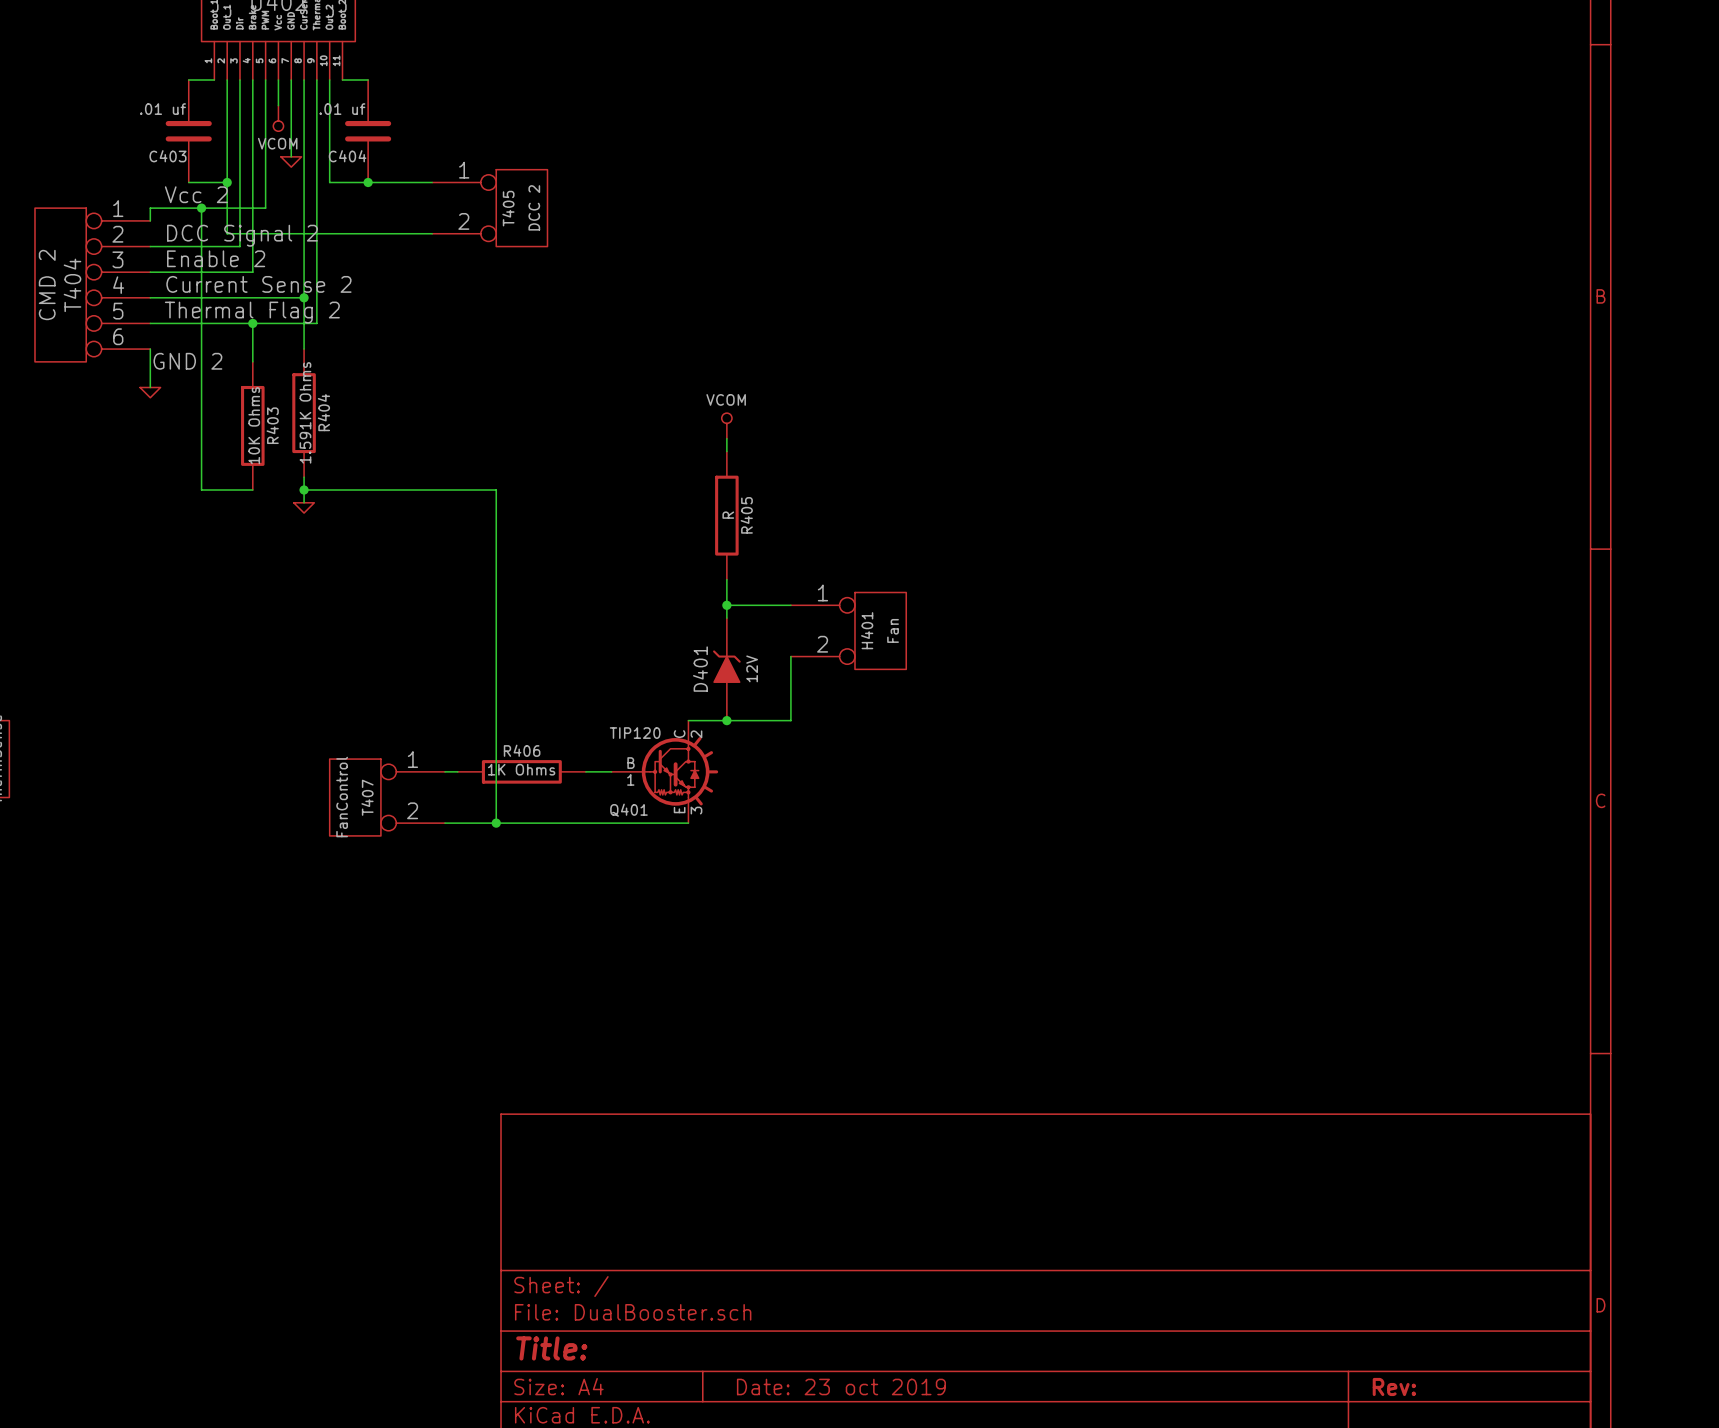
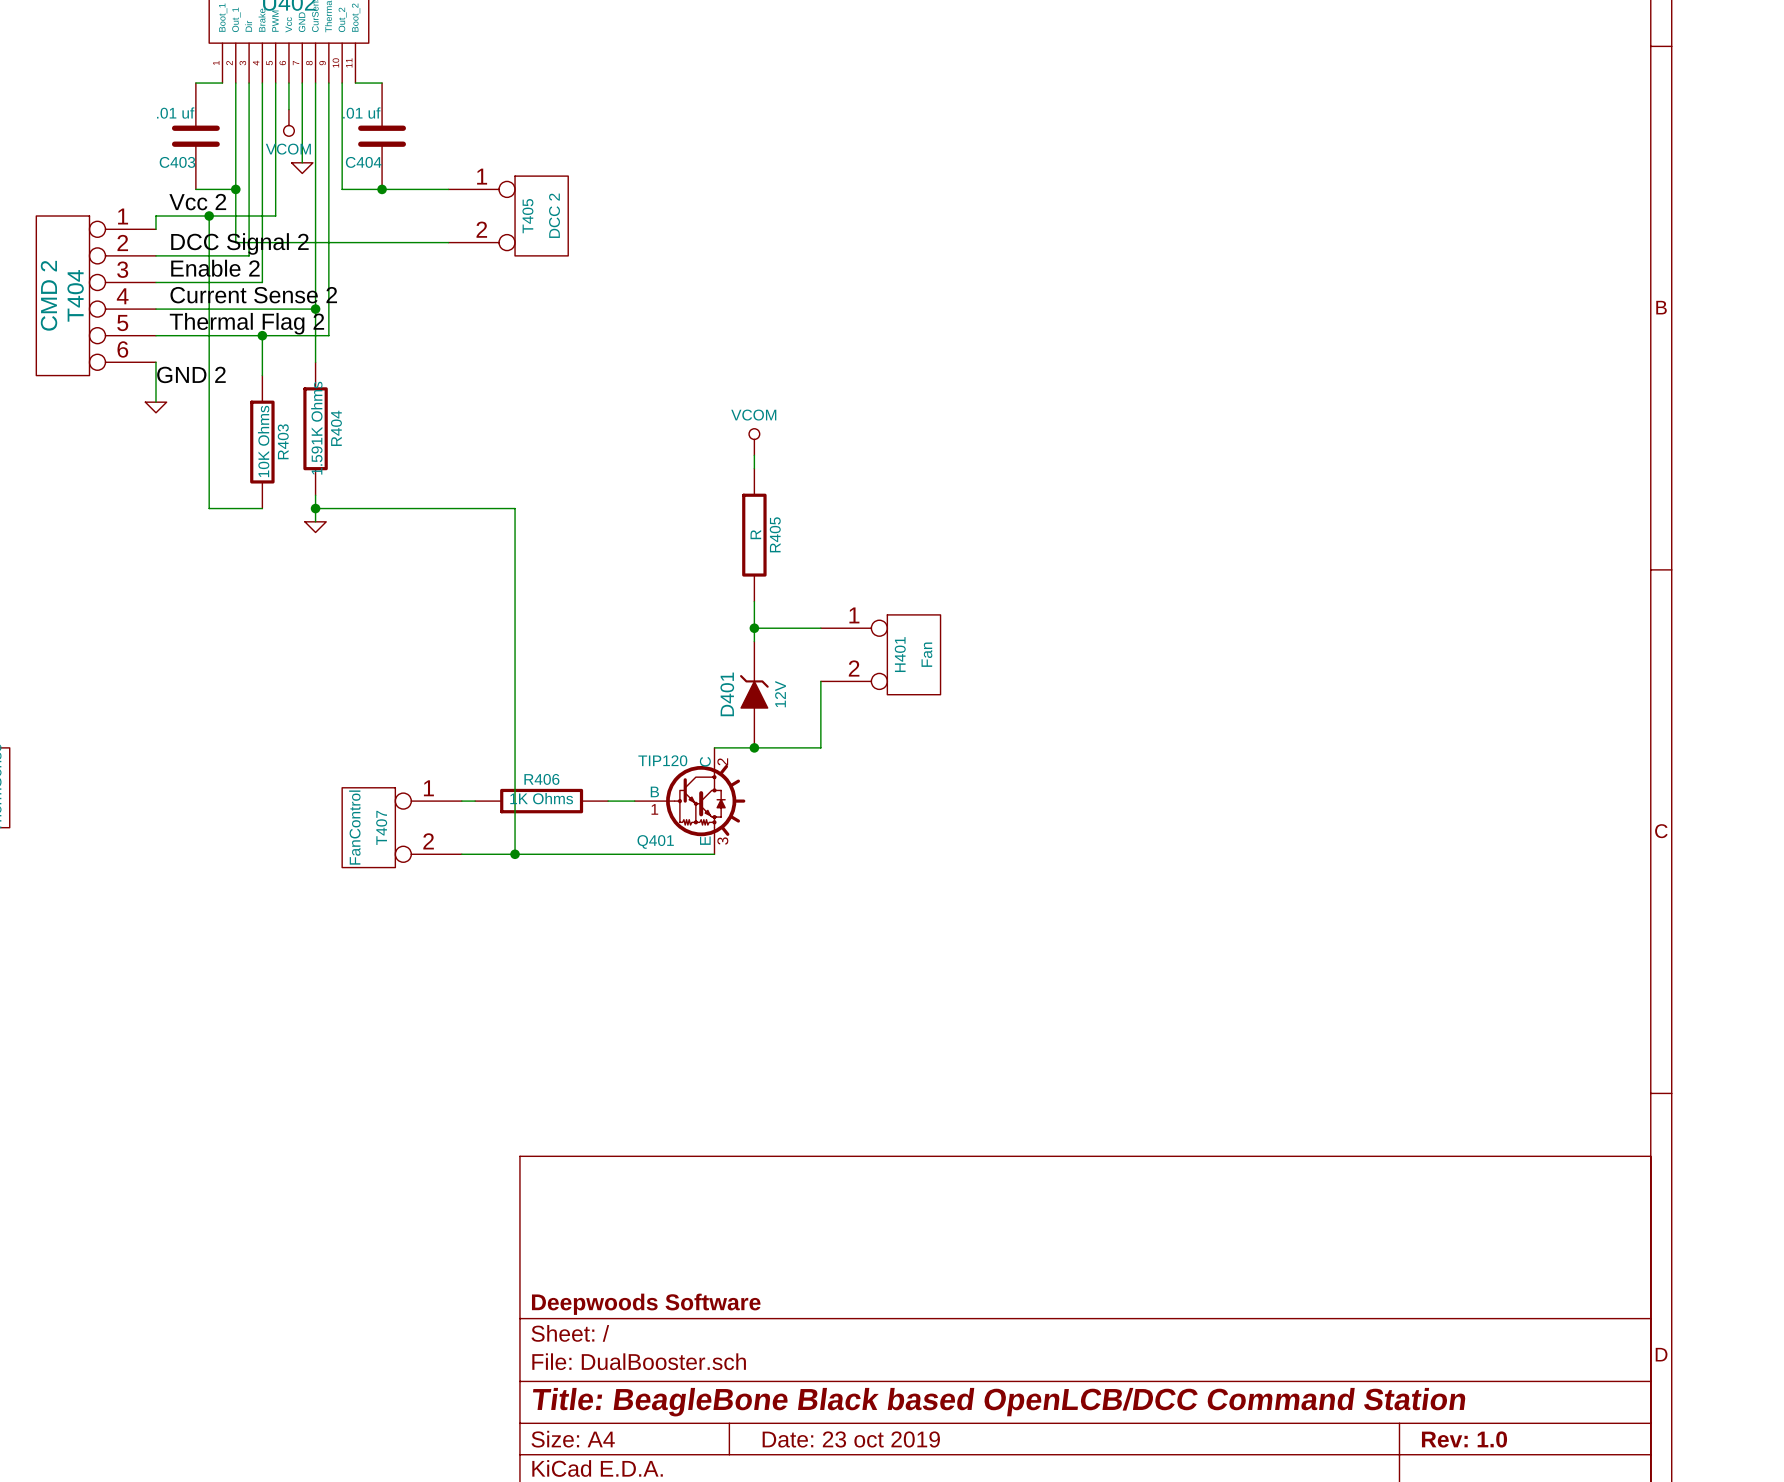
title block: none -> Deepwoods Software (646, 1304)
title block: Title: (551, 1348) -> Title: BeagleBone Black based OpenLCB/DCC Command Station (999, 1402)
title block: Rev: (1394, 1386) -> Rev: 1.0 (1464, 1439)

